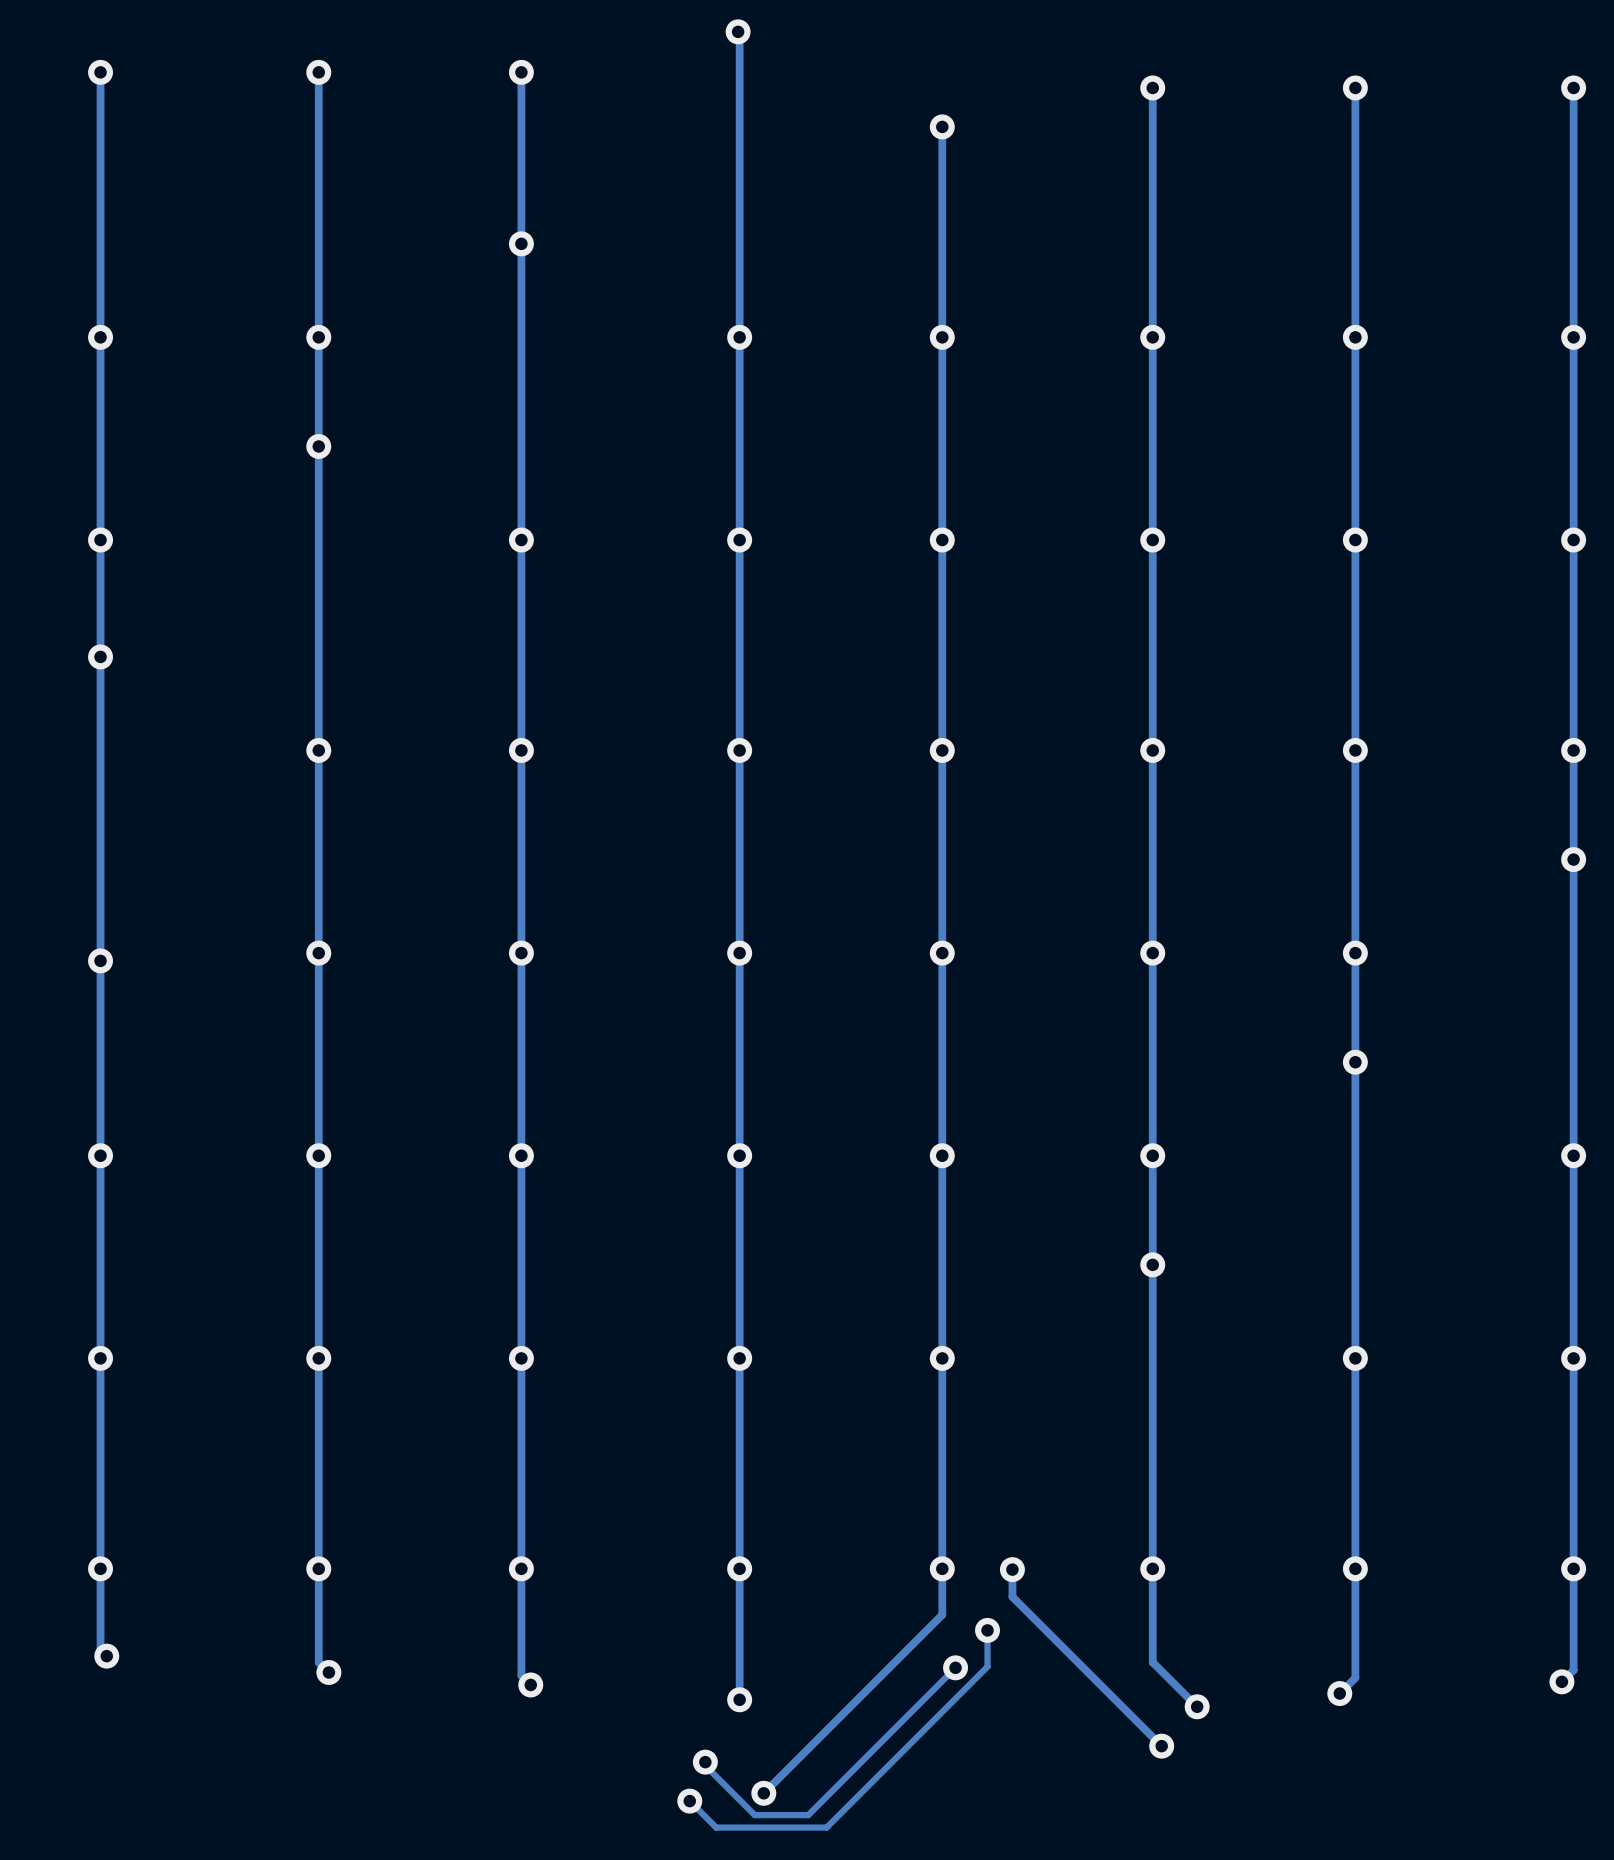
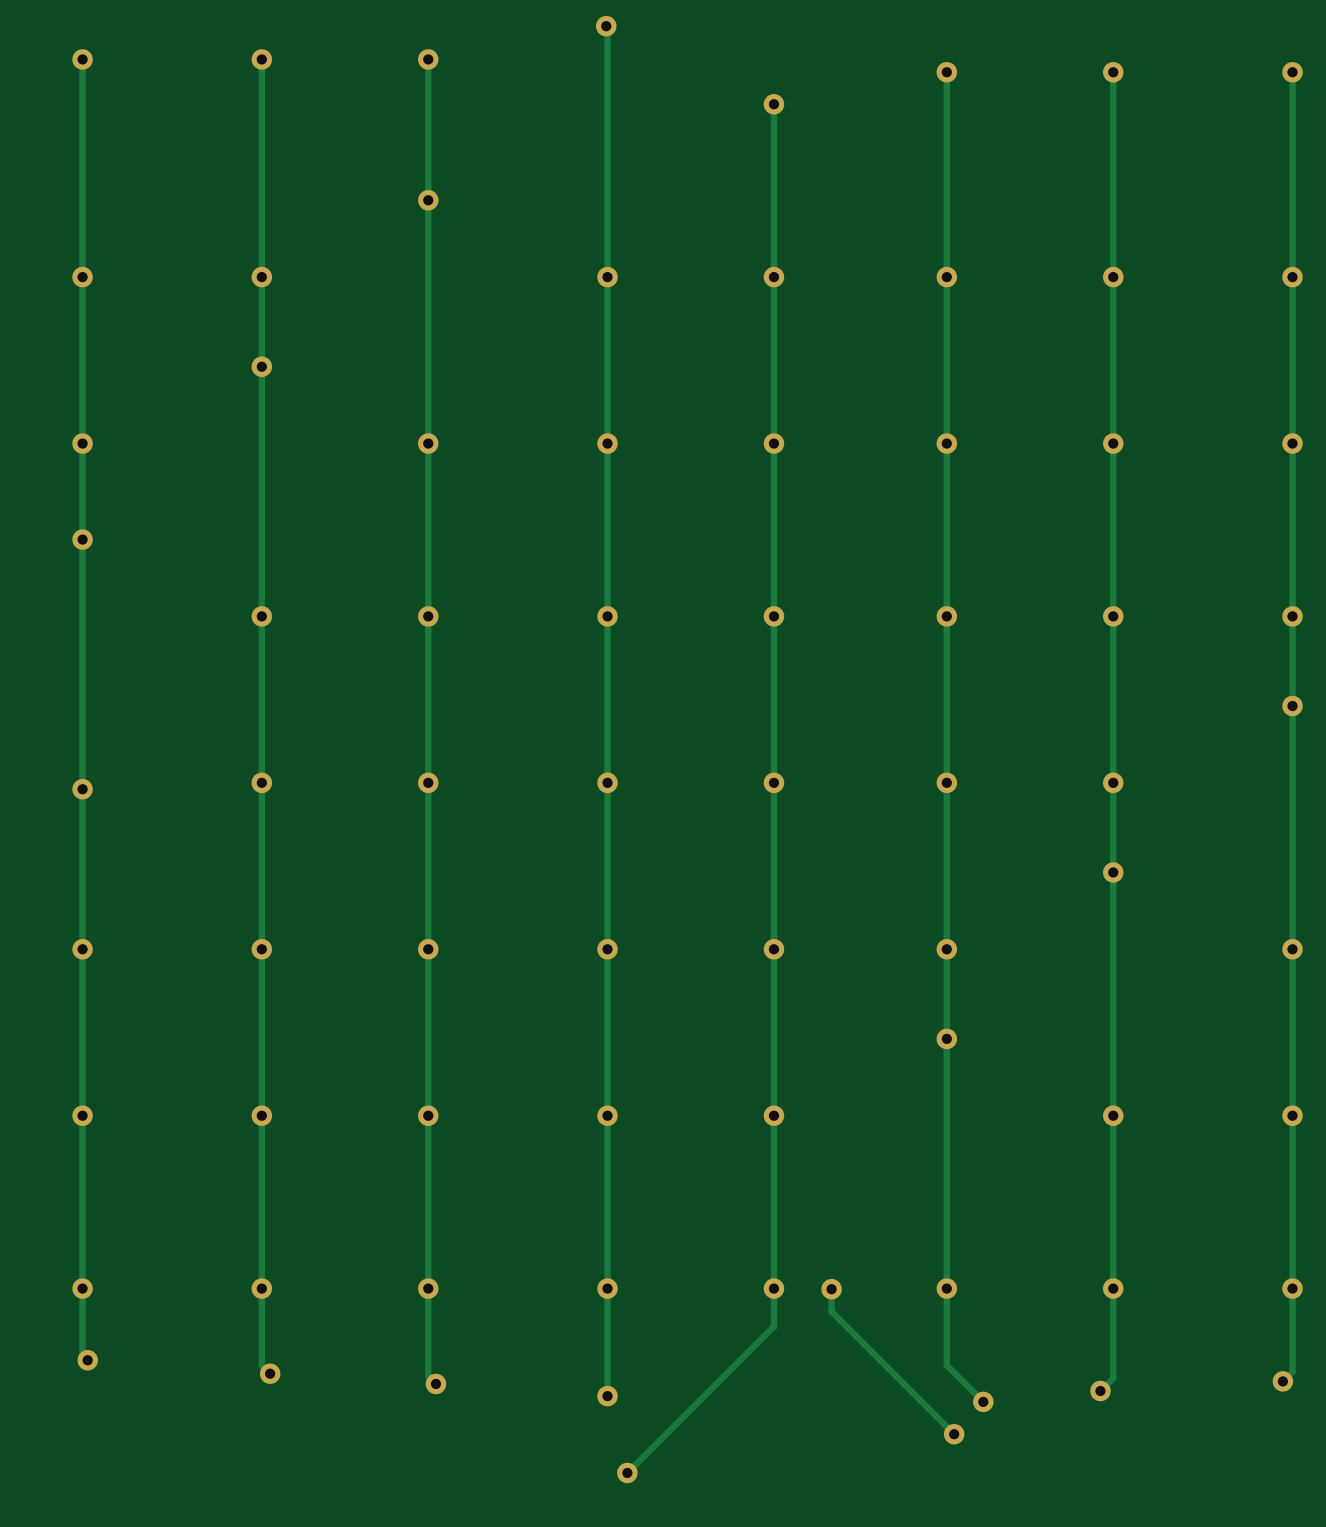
track: (987, 1630) (987, 1666) (826, 1827) (716, 1827) (689, 1801) -> none
via: (987, 1630) -> none
track: (955, 1667) (808, 1815) (754, 1815) (705, 1765) (705, 1762) -> none
via: (955, 1667) -> none
via: (705, 1762) -> none
via: (689, 1801) -> none

